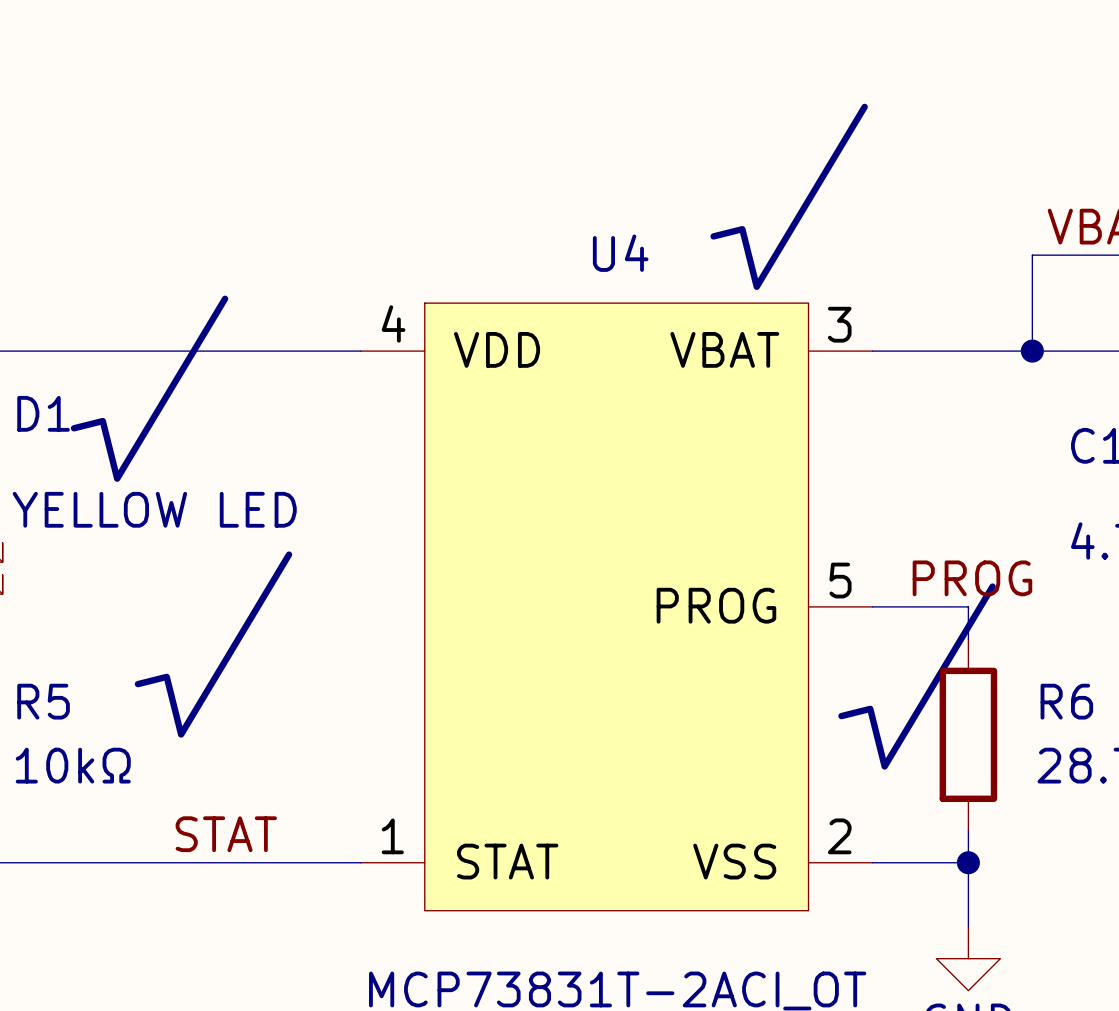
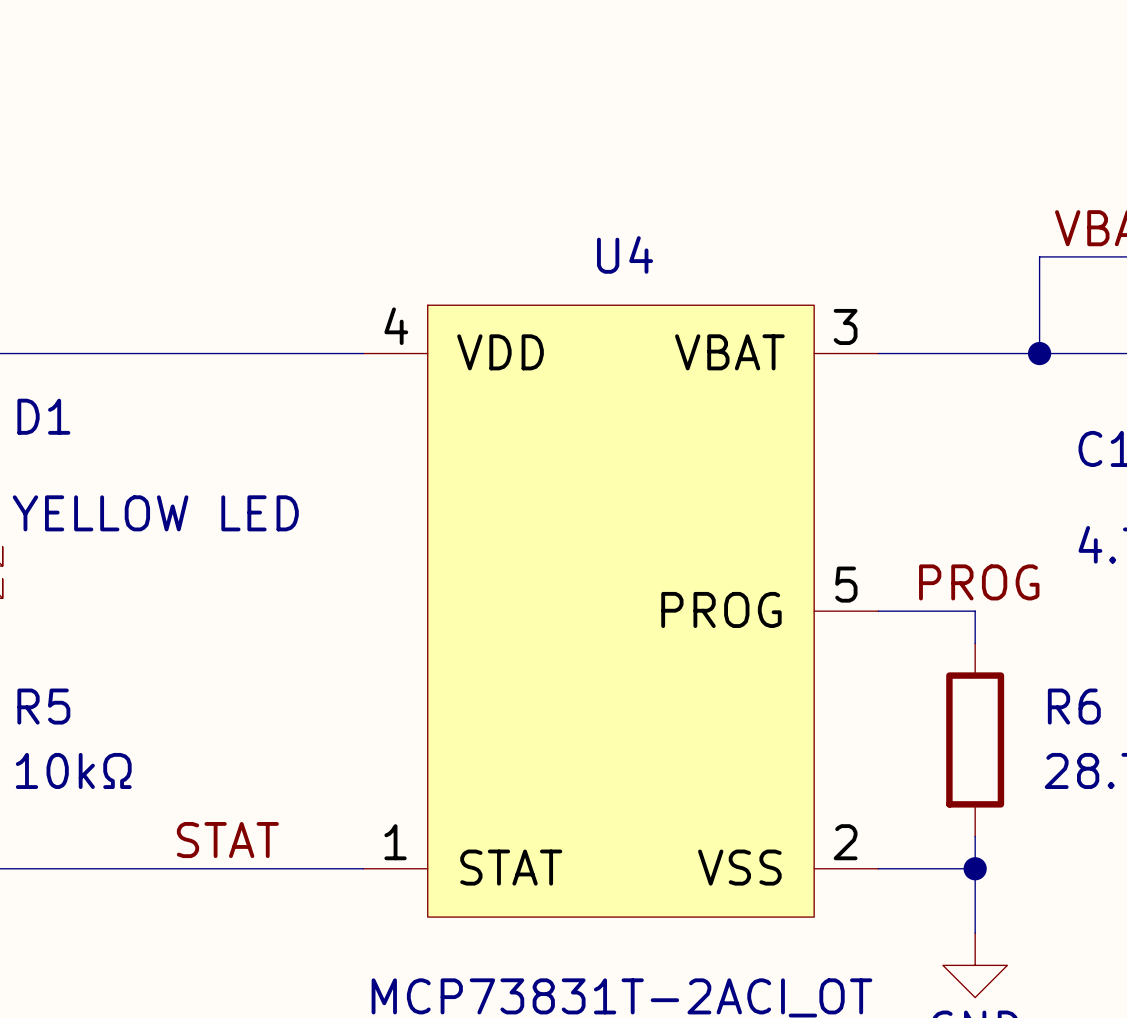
text: √ (789, 196) -> none
text: √ (149, 388) -> none
text: √ (213, 644) -> none
text: √ (917, 676) -> none

